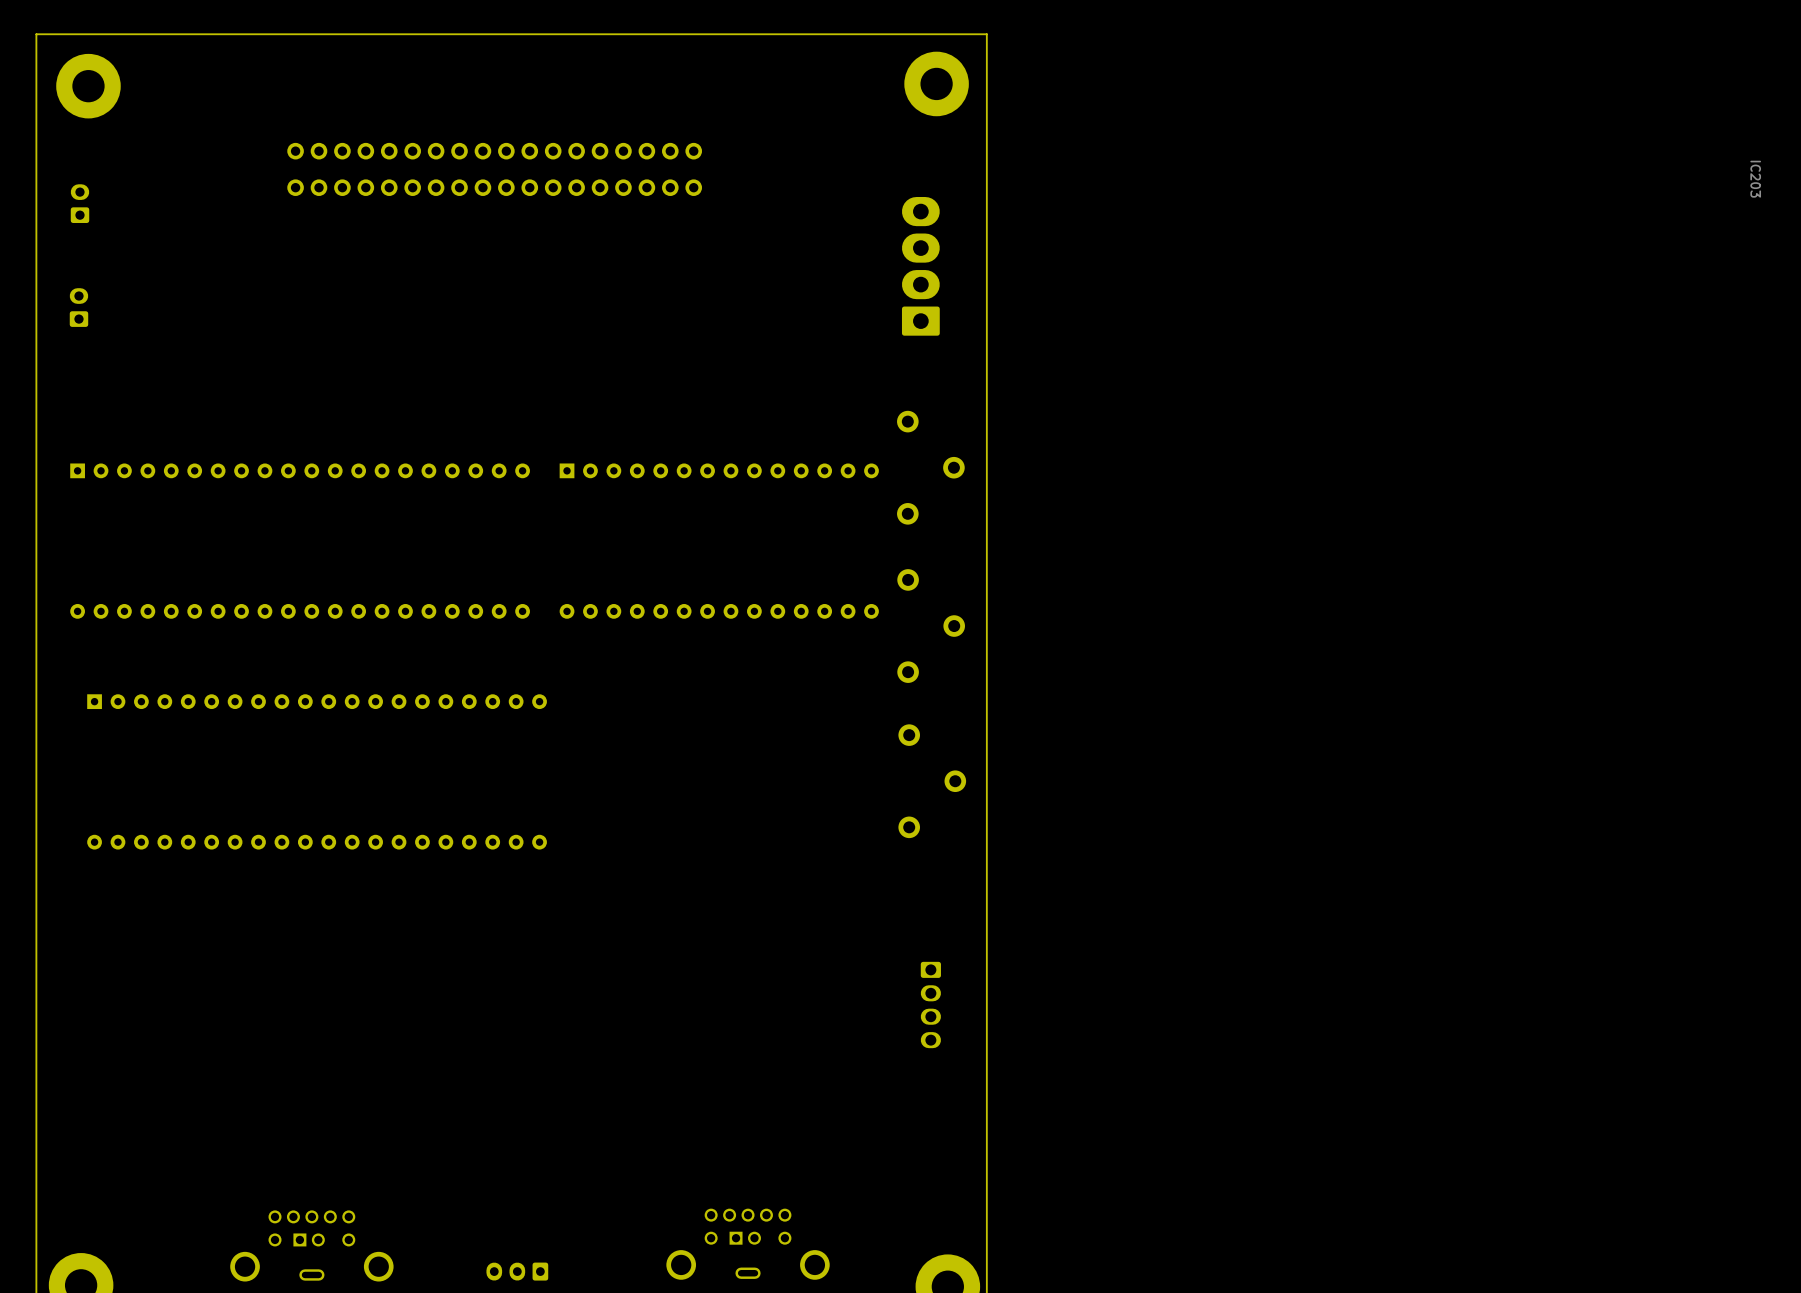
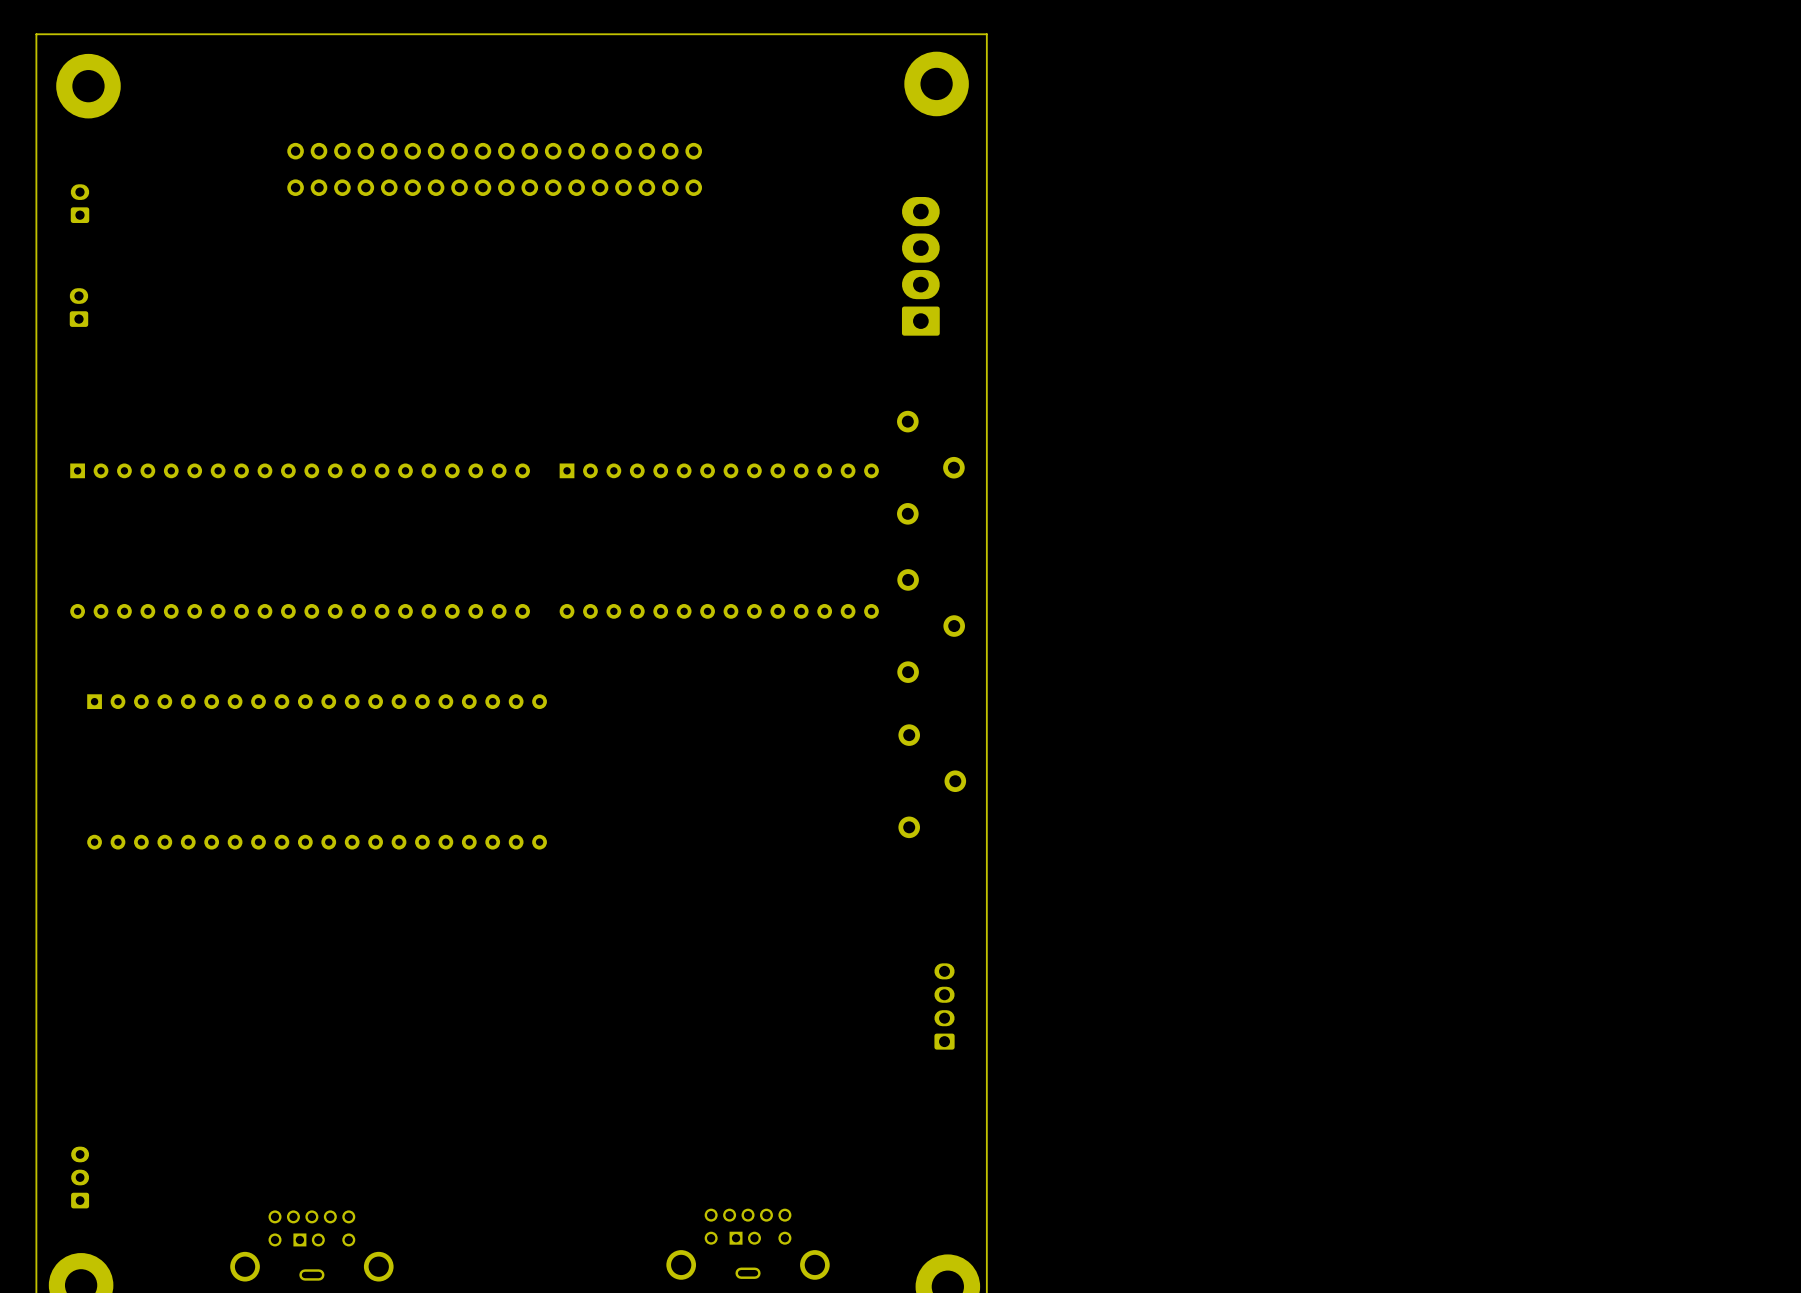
IC203: (1755, 179) -> none
part rotation: 0° (930, 1005) -> 180° (944, 1006)
part: none -> (80, 1177)
part: (517, 1271) -> none

